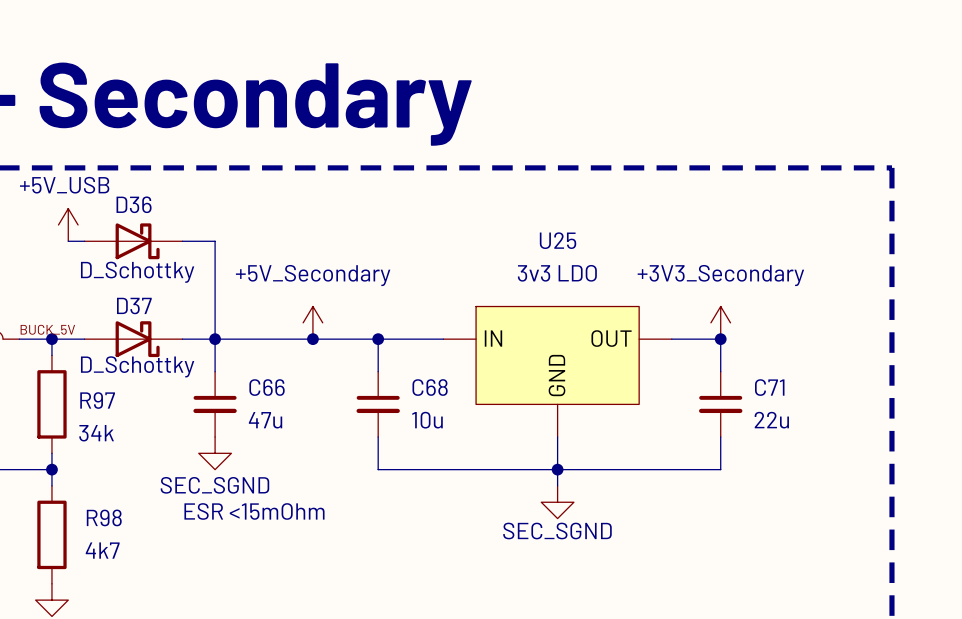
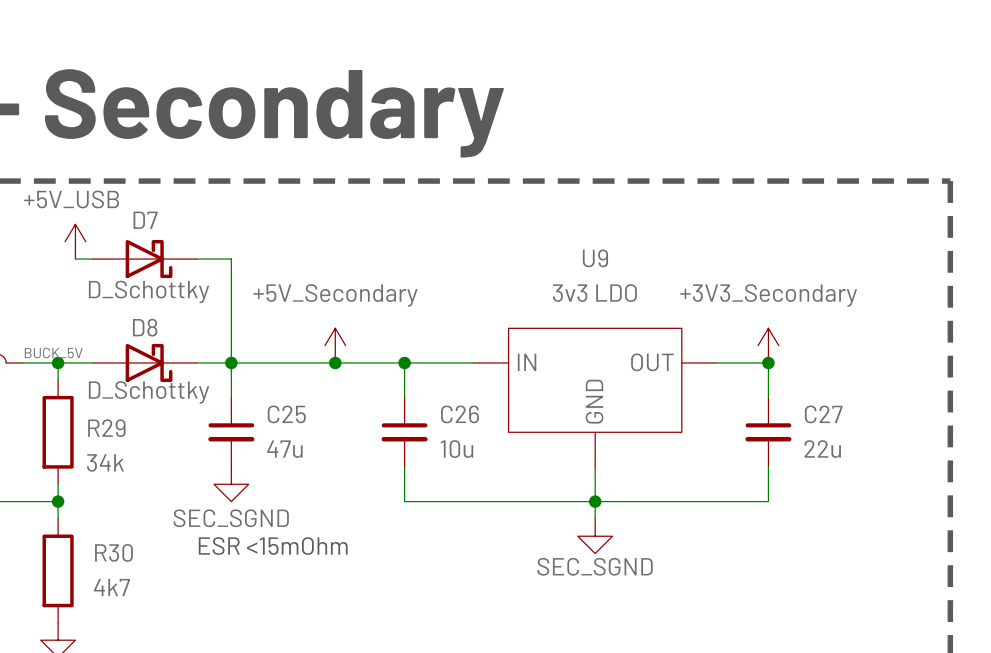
D36 name: D36 (134, 204) -> D7 (145, 220)
U25 name: U25 (558, 240) -> U9 (595, 258)
D37 name: D37 (134, 306) -> D8 (145, 327)
C66 name: C66 (267, 387) -> C25 (286, 414)
C68 name: C68 (430, 387) -> C26 (460, 414)
C71 name: C71 (769, 387) -> C27 (823, 414)
R97 name: R97 (97, 400) -> R29 (106, 428)
R98 name: R98 (104, 517) -> R30 (113, 552)

